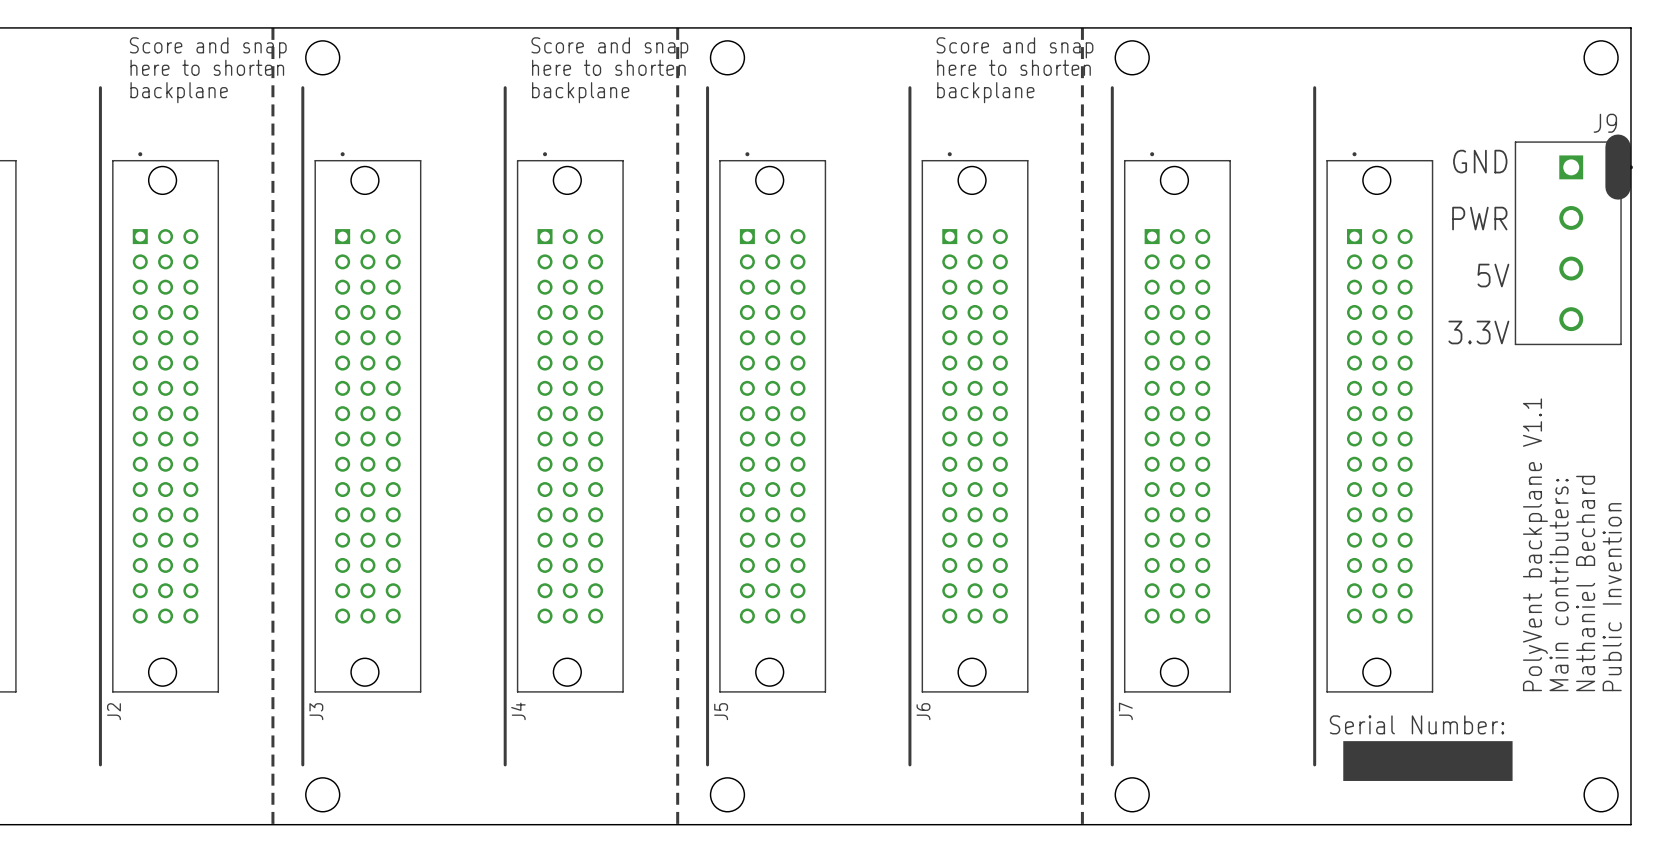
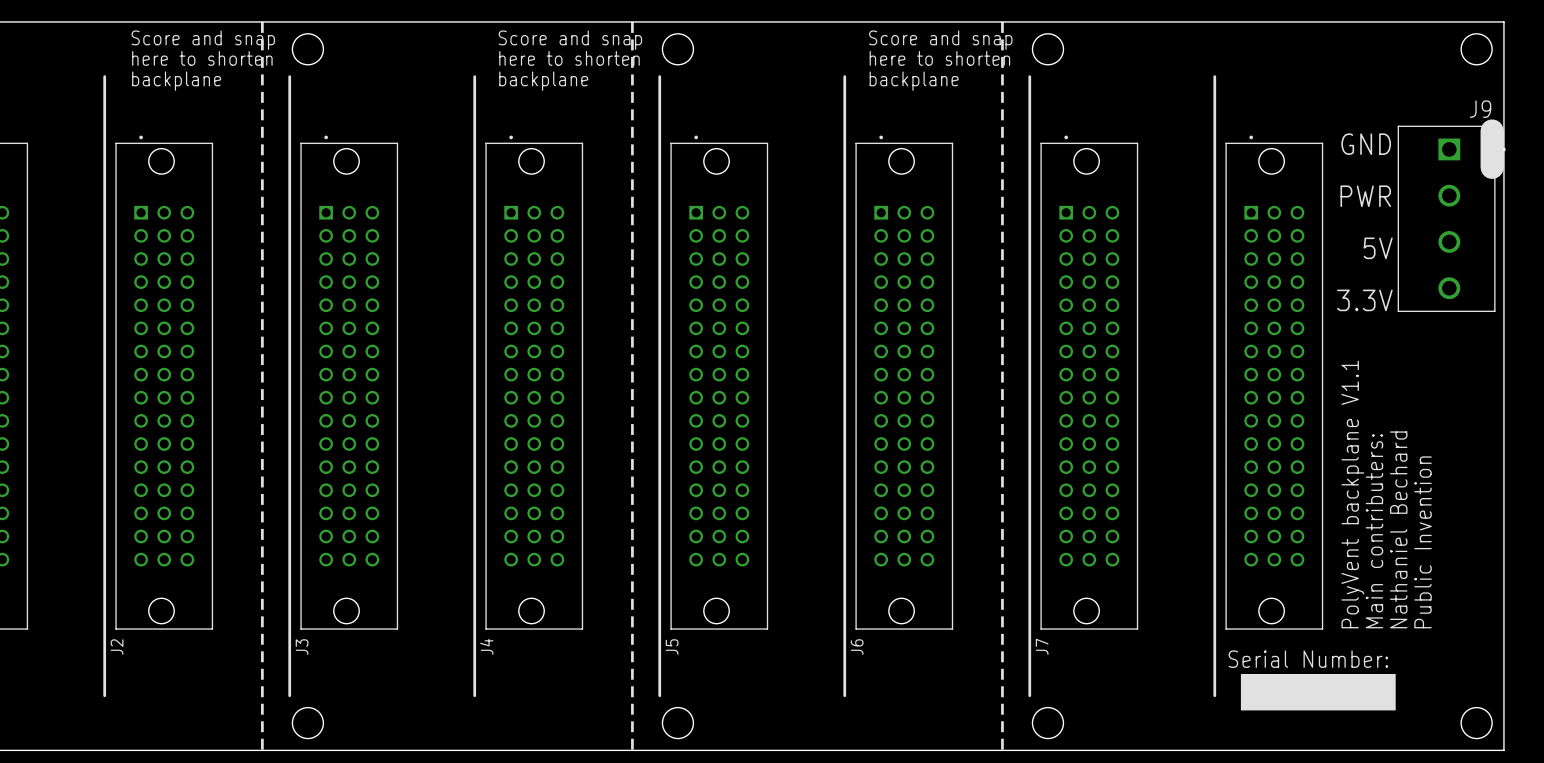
text position: PolyVent backplane V1.1 (1535, 544) -> PolyVent backplane V1.1 (1352, 494)
text position: Nathaniel Bechard (1585, 583) -> Nathaniel Bechard (1398, 529)
text position: Main contributers: (1559, 585) -> Main contributers: (1374, 531)
text position: Public Invention (1612, 597) -> Public Invention (1423, 542)

